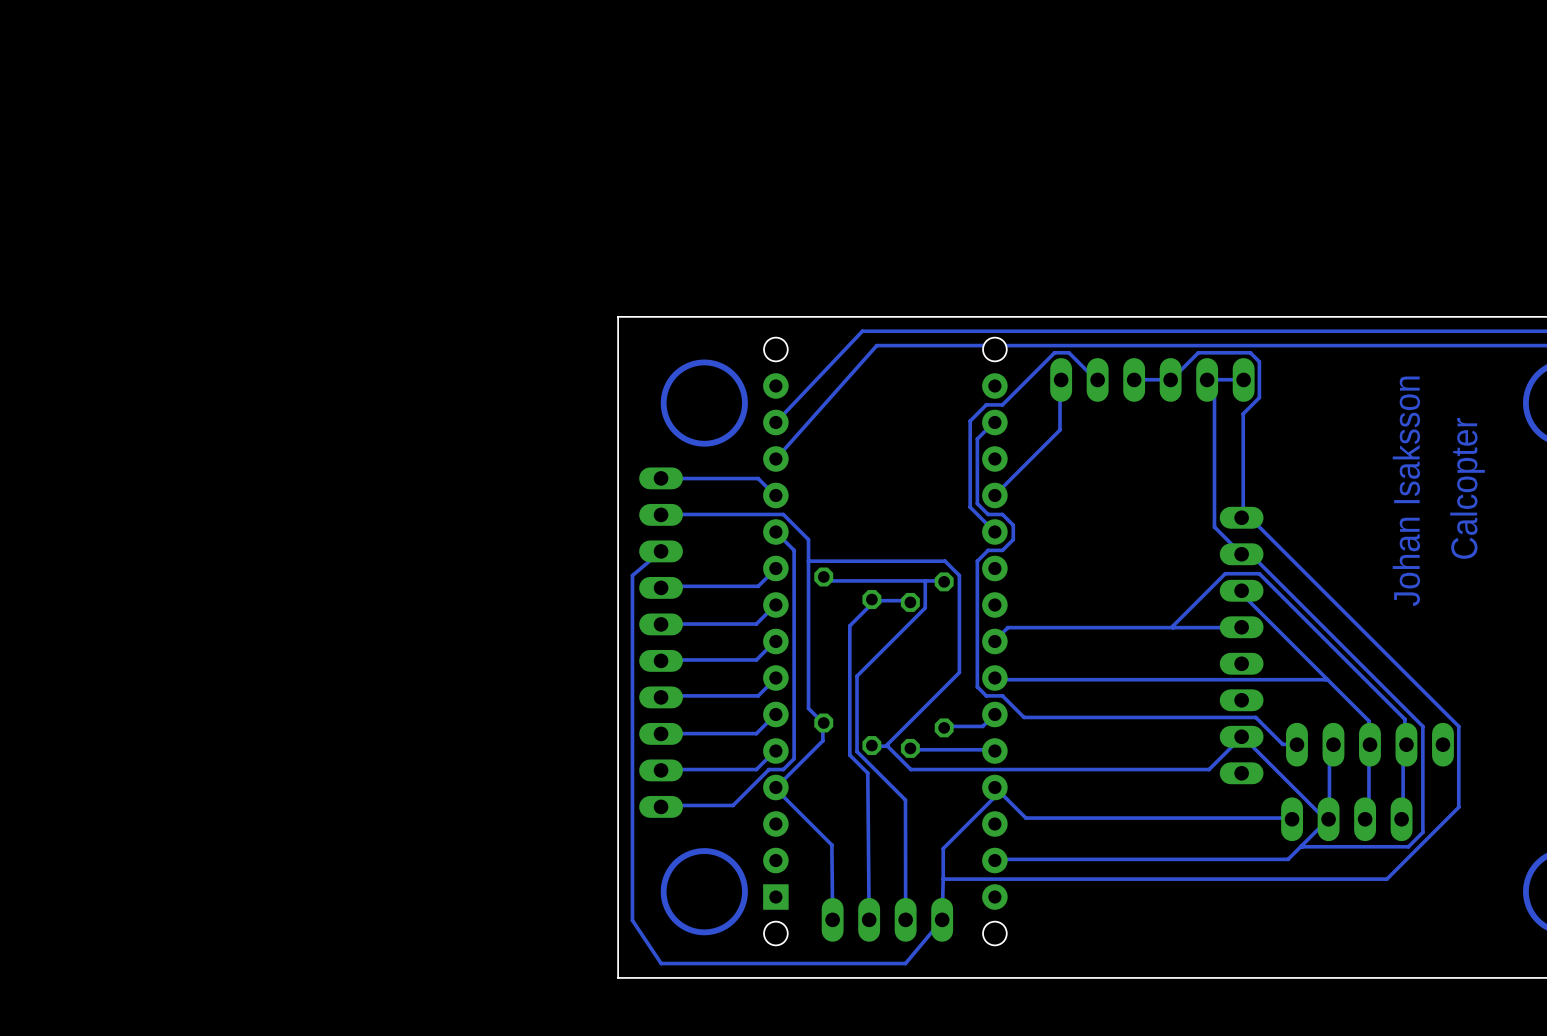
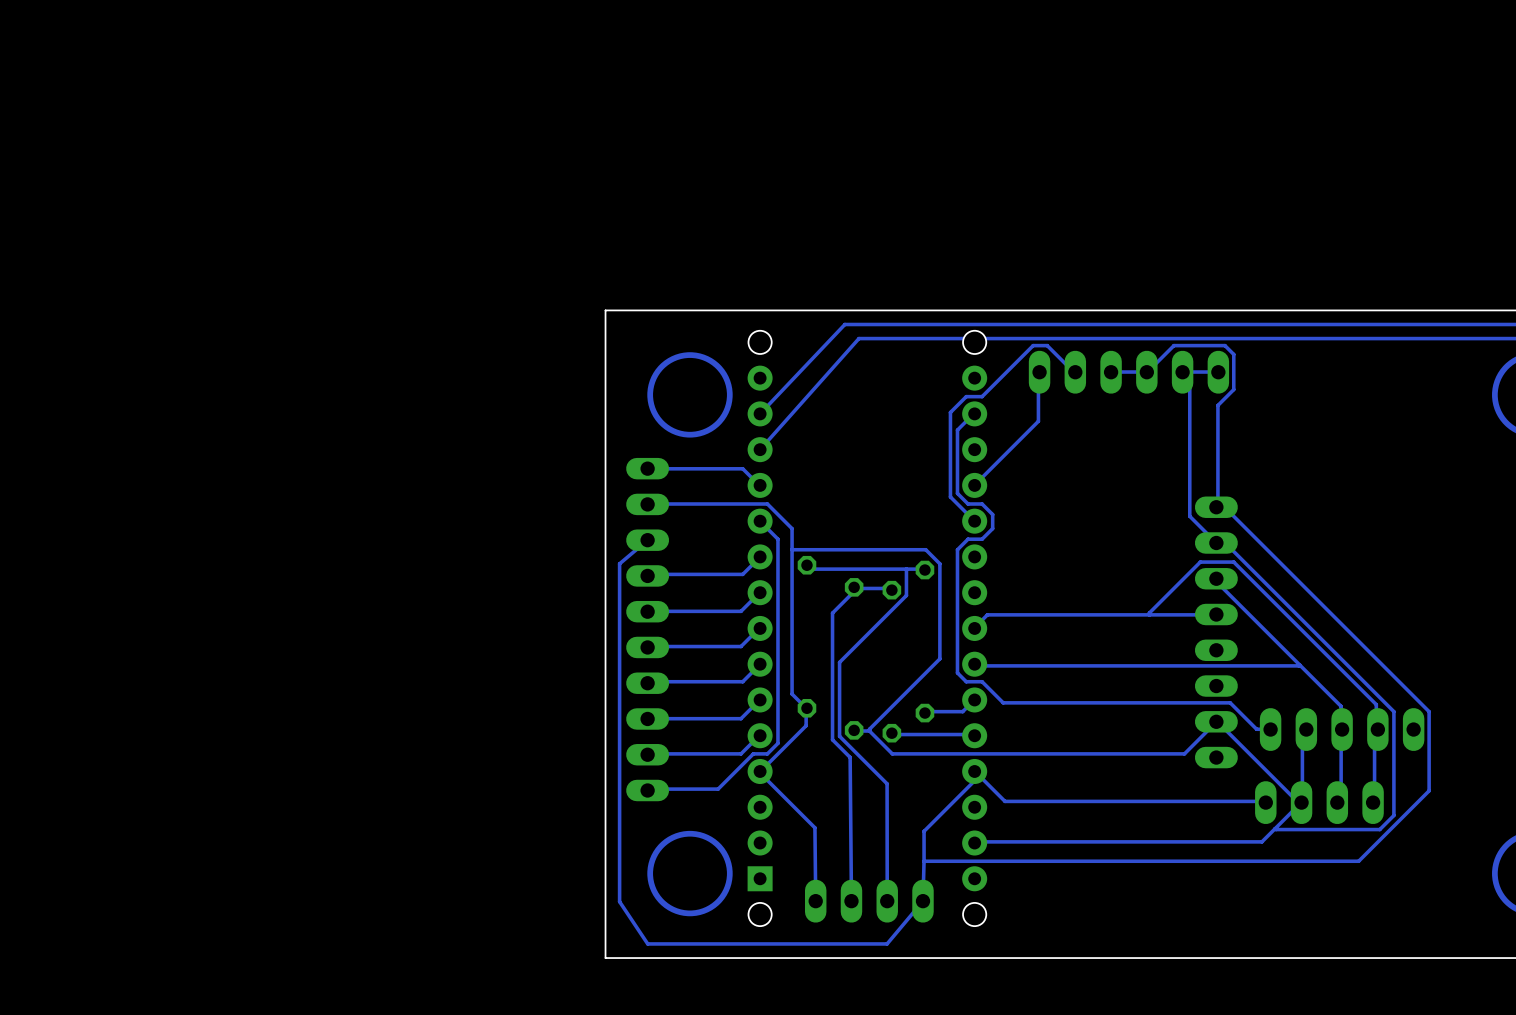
text: Calcopter (1467, 488) -> none
text: Johan Isaksson (1406, 491) -> none

